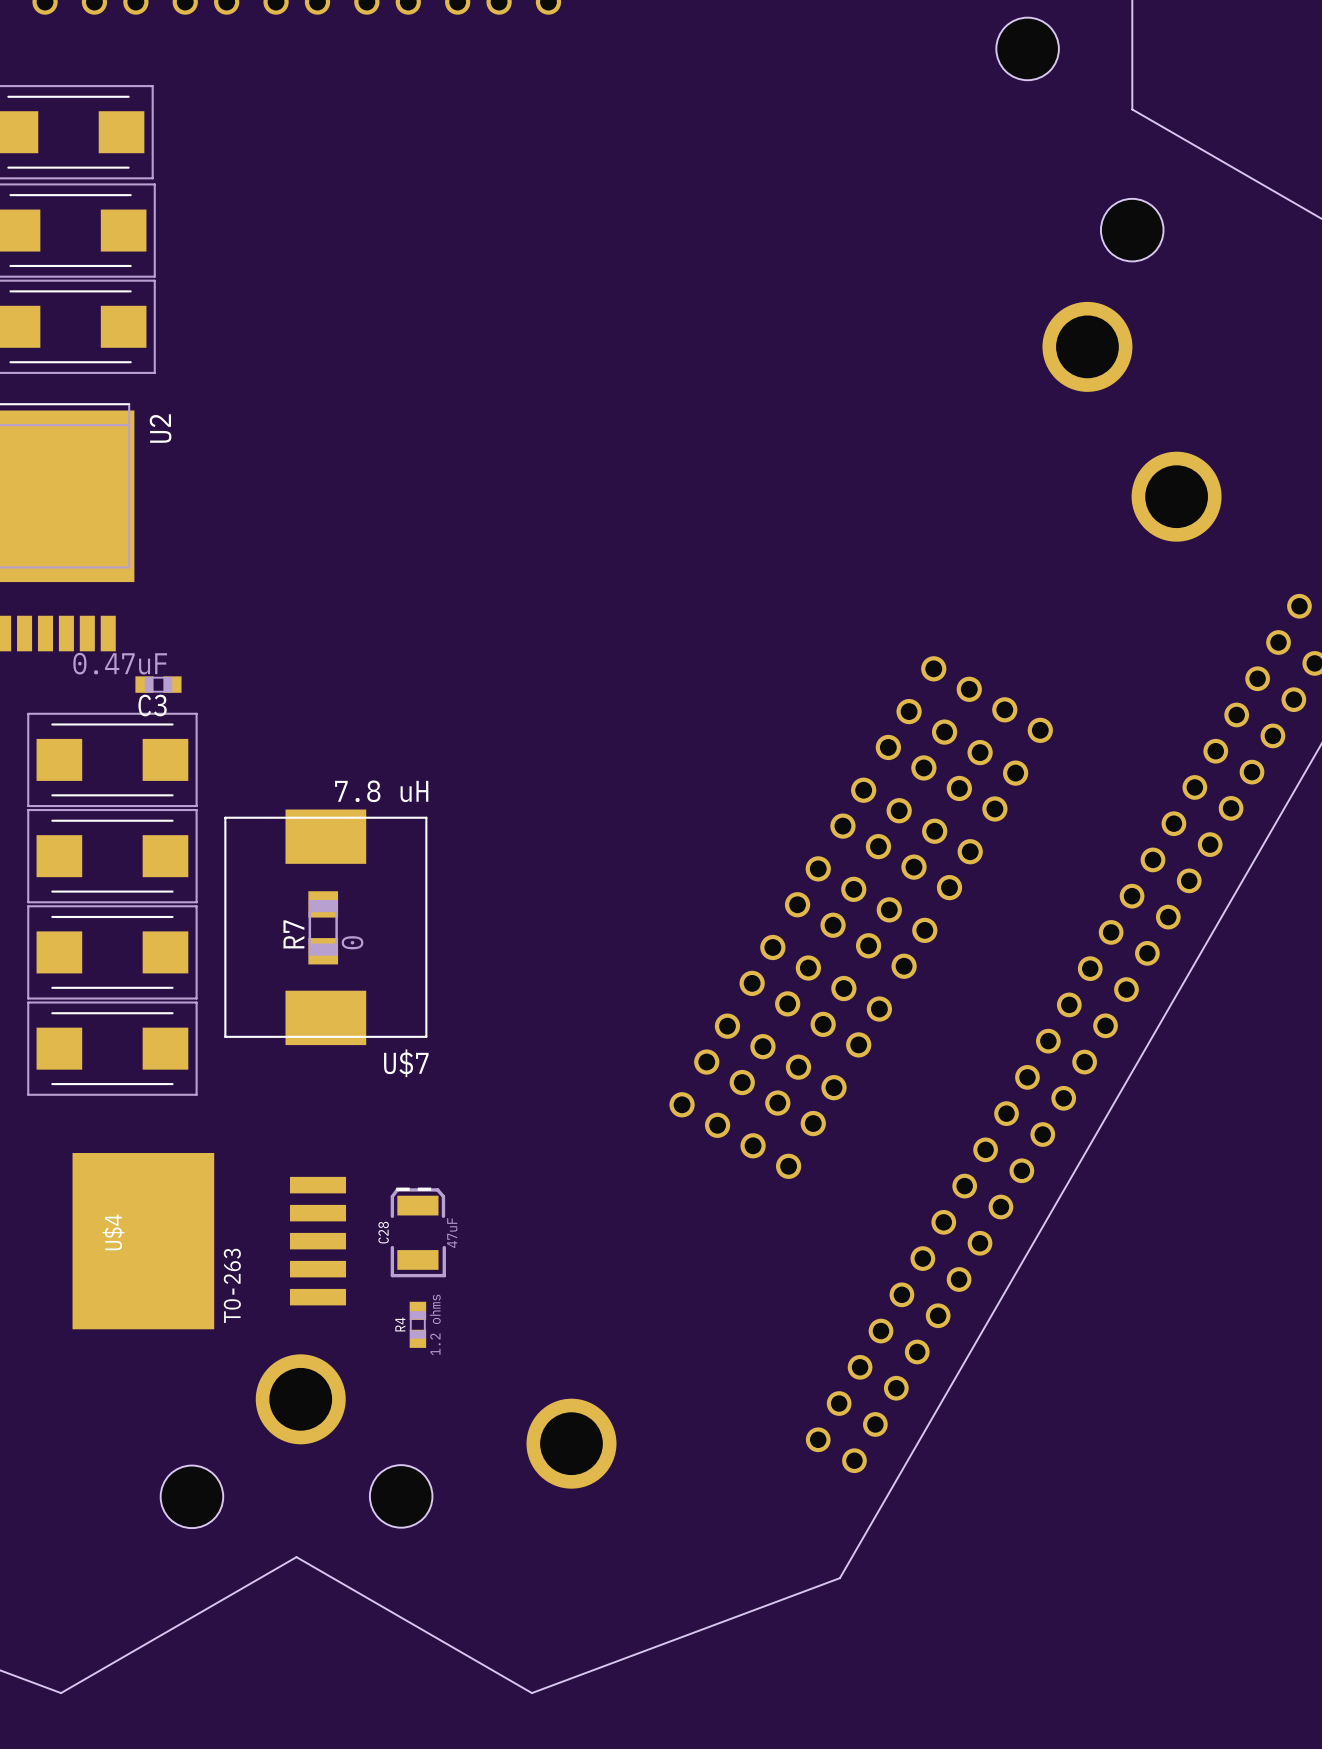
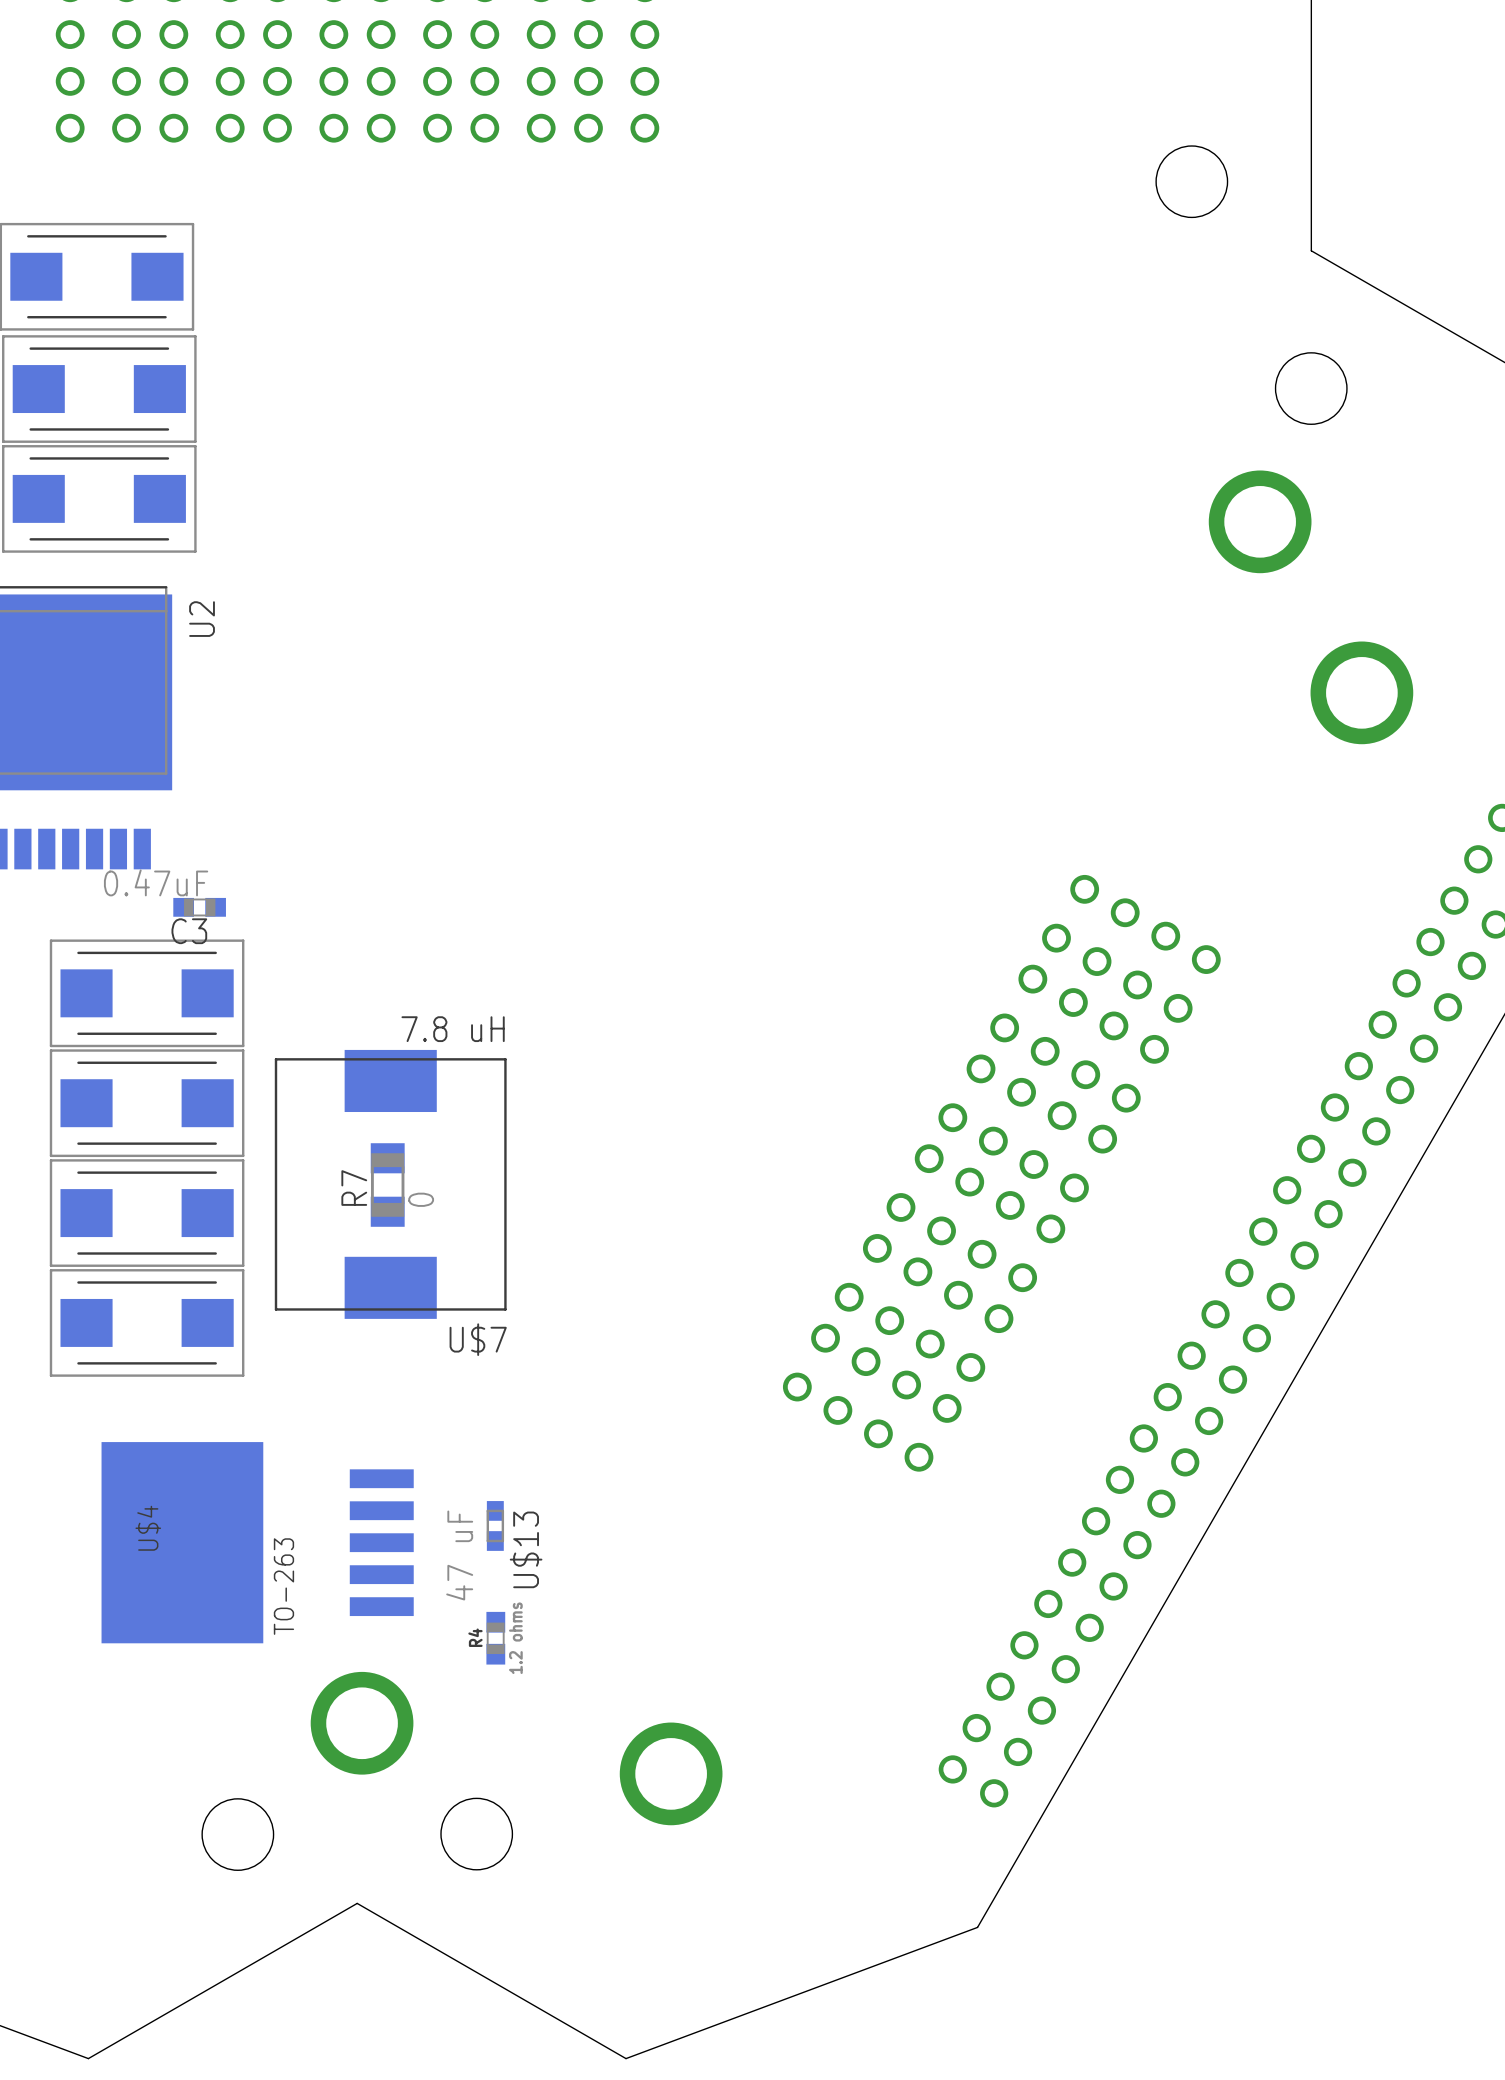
U$13: none -> 47 uF (495, 1525)
C28: 47uF (418, 1232) -> none

